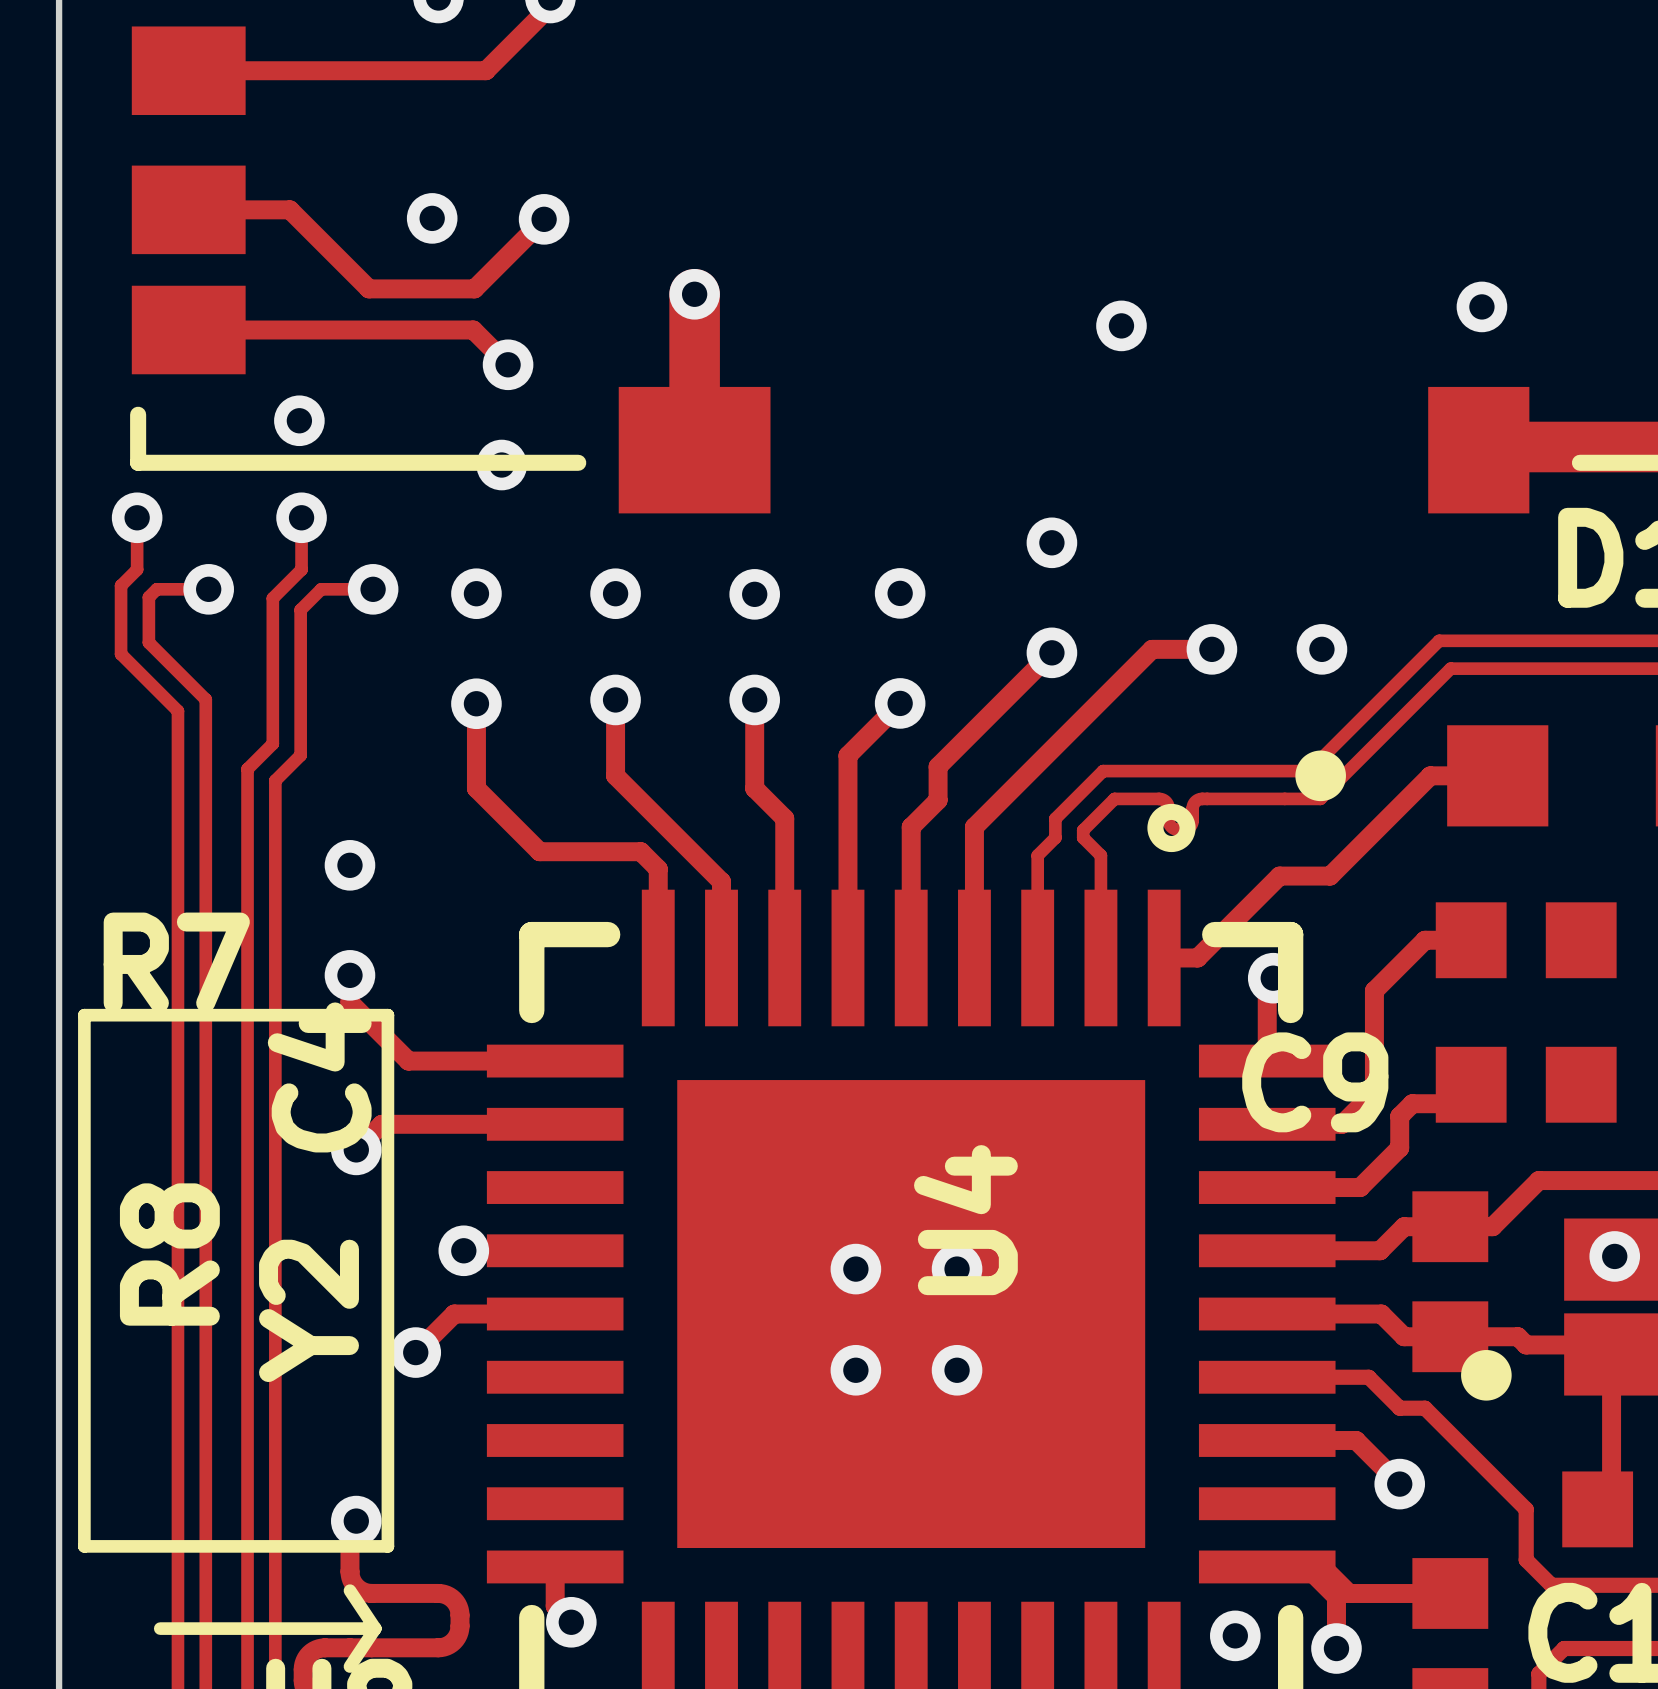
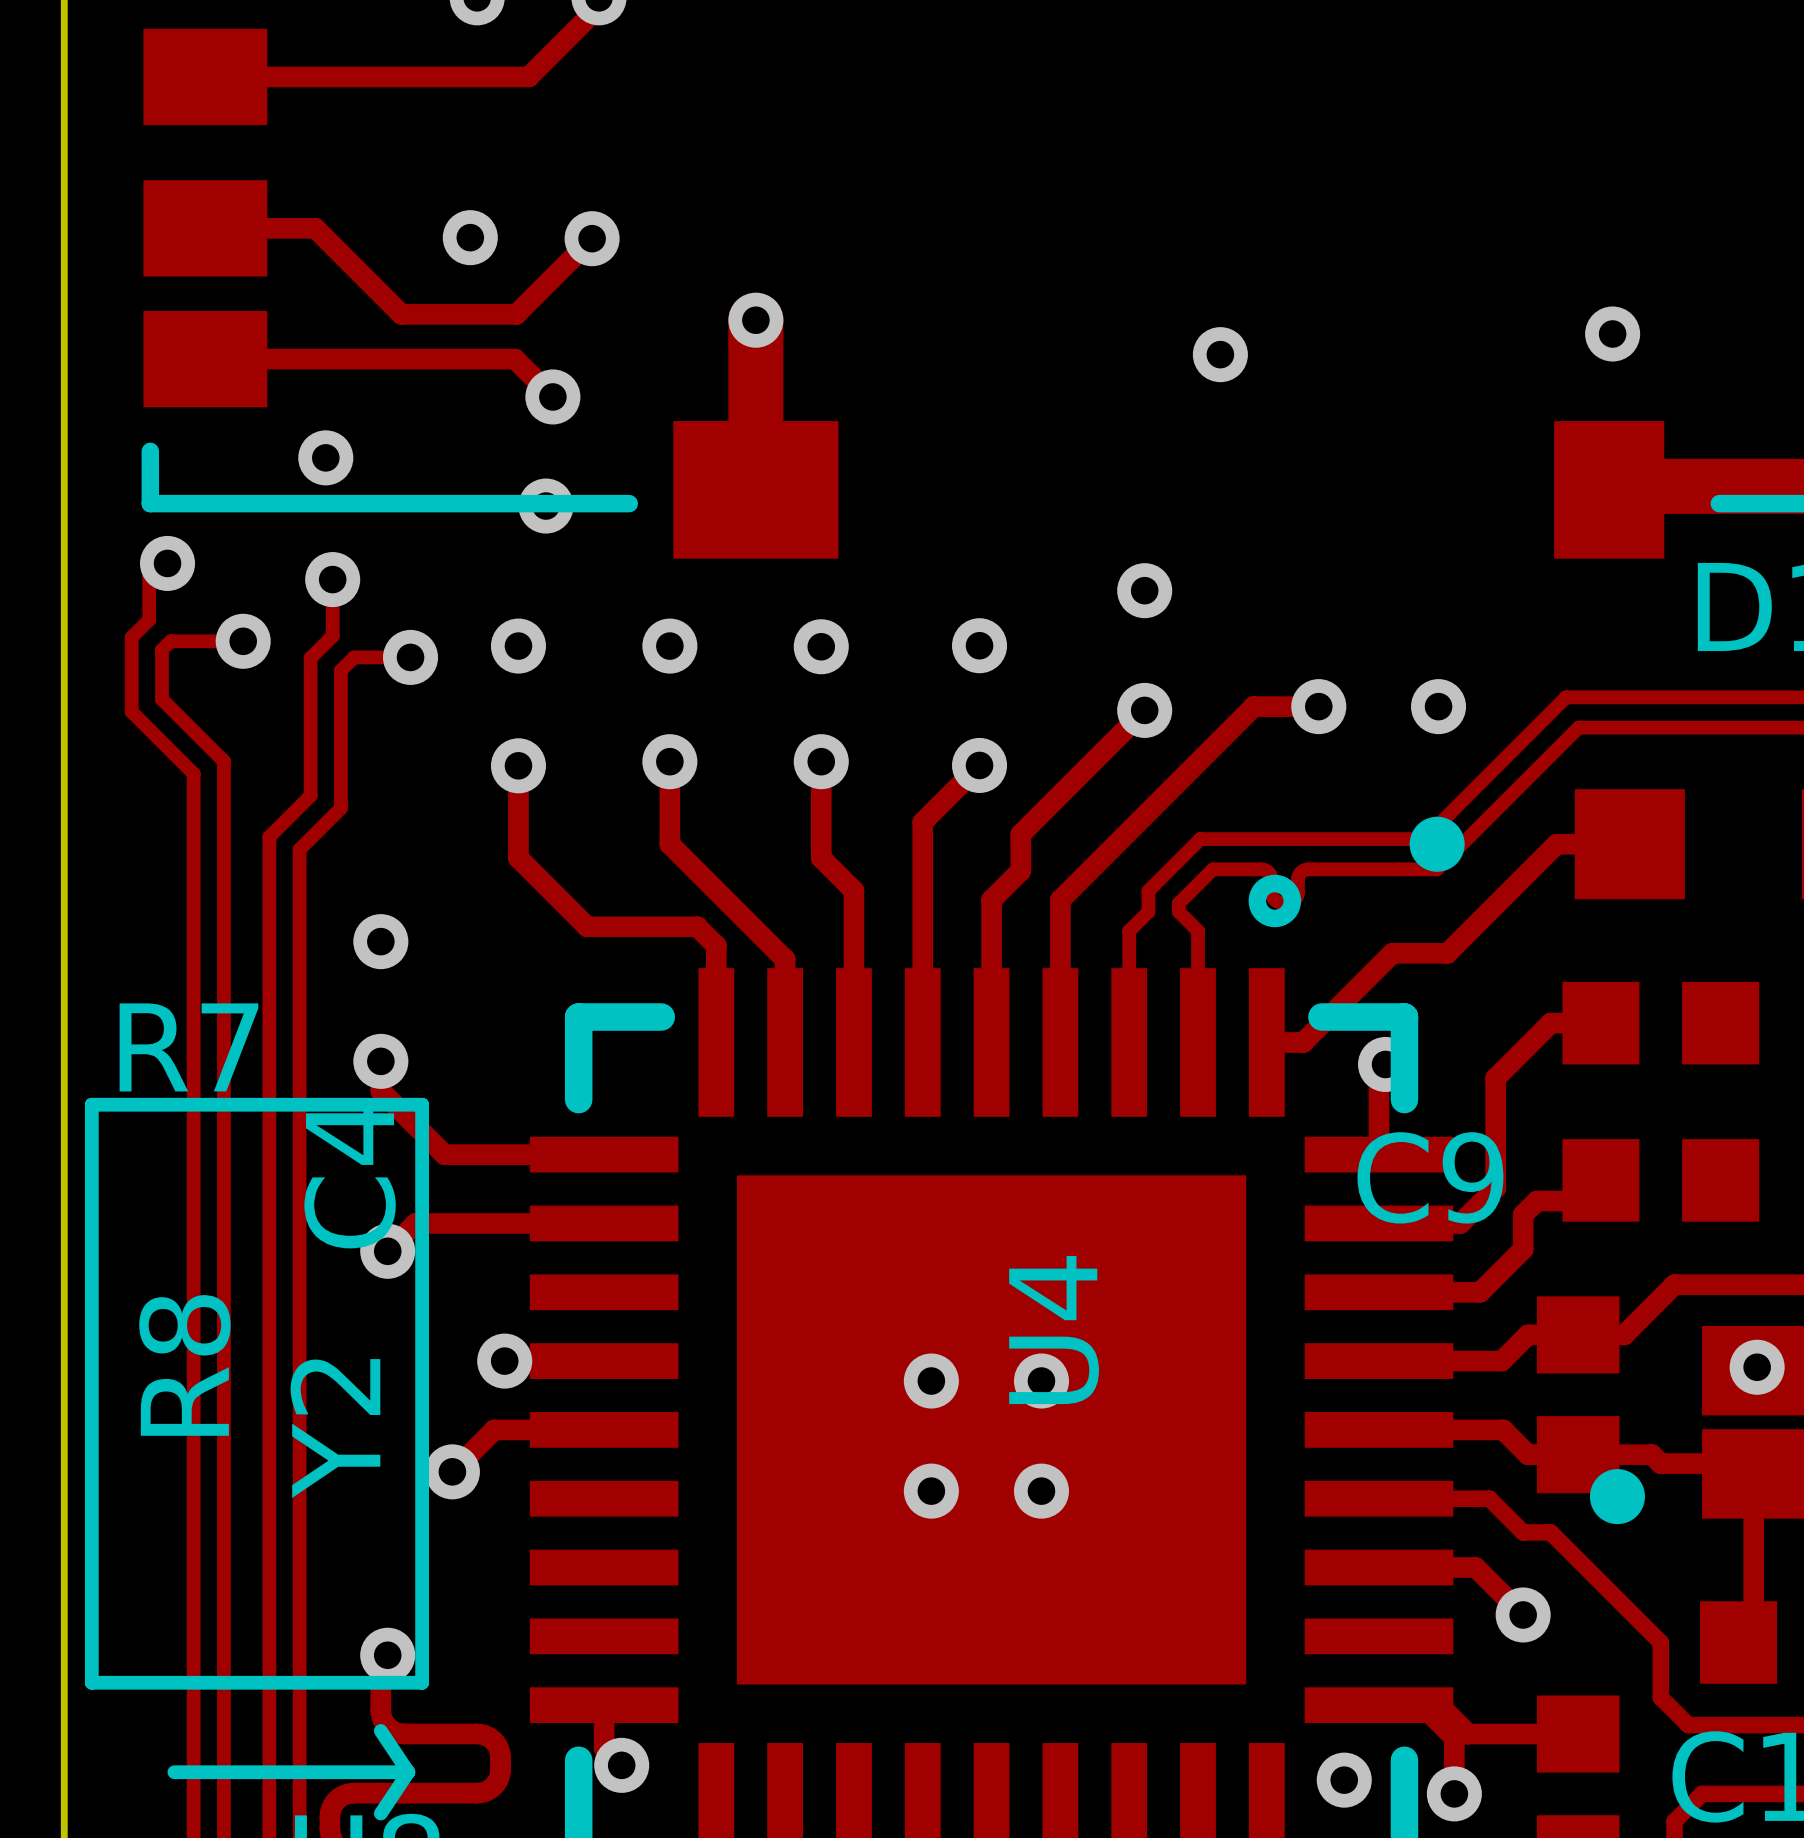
via position: (137, 517) -> (167, 563)
track: (301, 517) (301, 569) (272, 598) (272, 743) -> (332, 579) (332, 636) (310, 658) (310, 795) (296, 809)
via position: (301, 517) -> (332, 579)
via position: (208, 589) -> (243, 641)
track: (373, 589) (321, 589) (300, 609) (300, 755) -> (410, 657) (354, 657) (340, 670) (340, 808) (327, 821)
via position: (373, 589) -> (410, 657)

